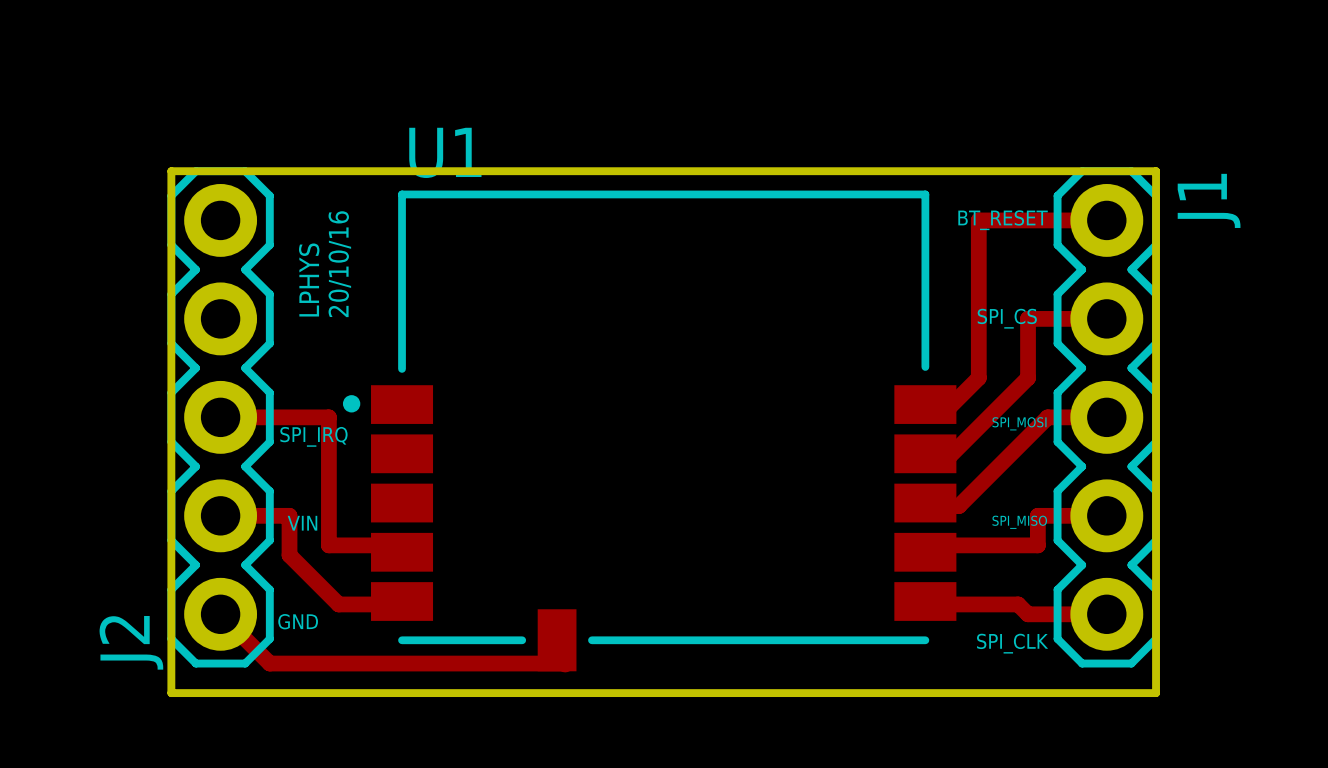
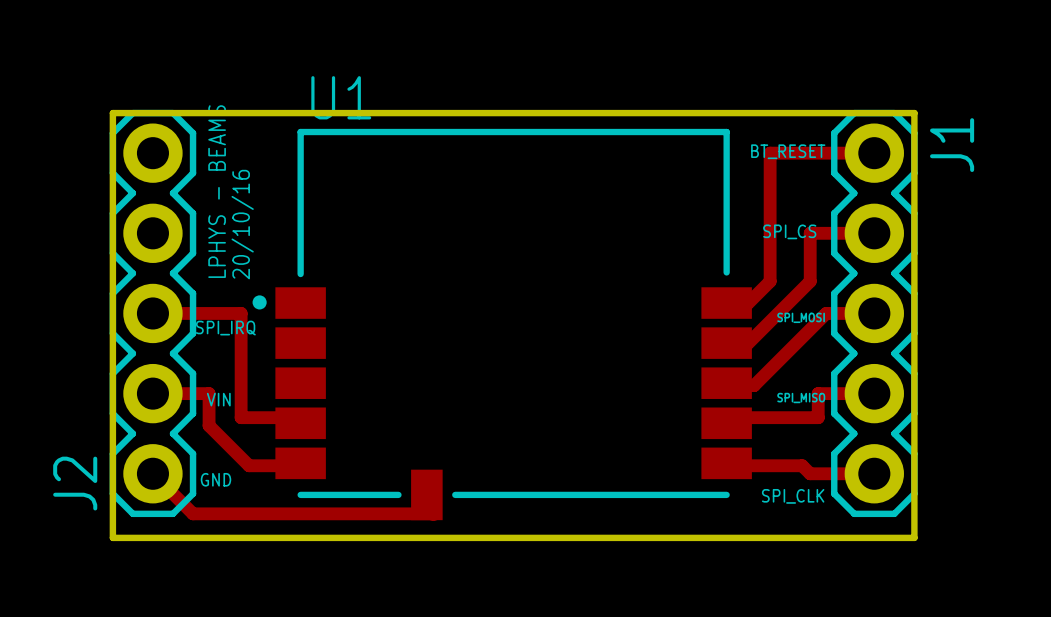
text position: 20/10/16 (339, 264) -> 20/10/16 (242, 224)
text: LPHYS (309, 280) -> none
text: none -> LPHYS - BEAMS (217, 191)

